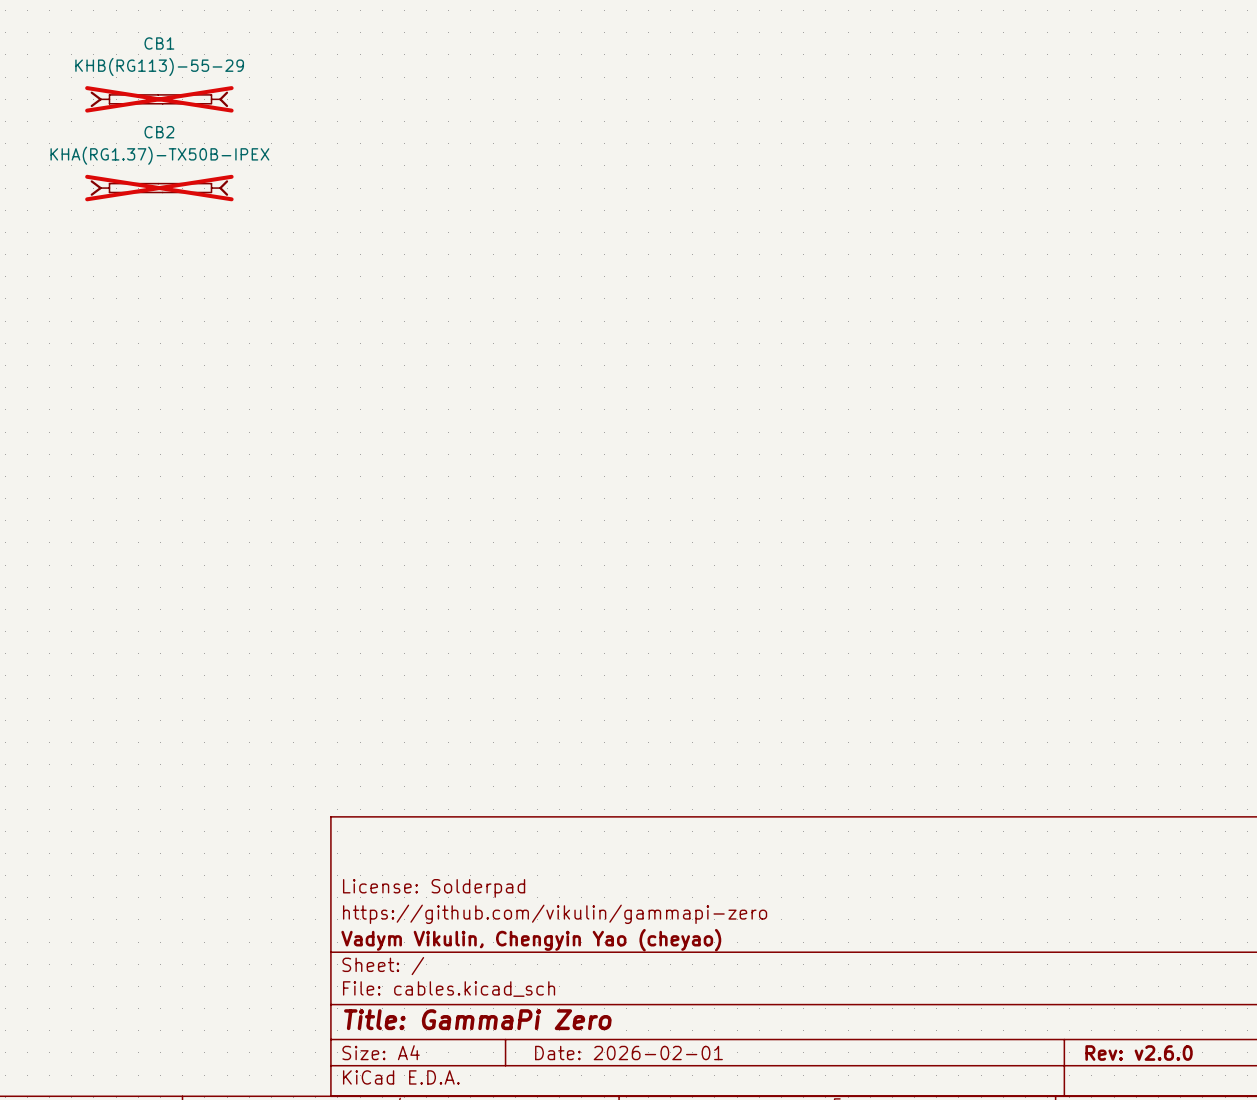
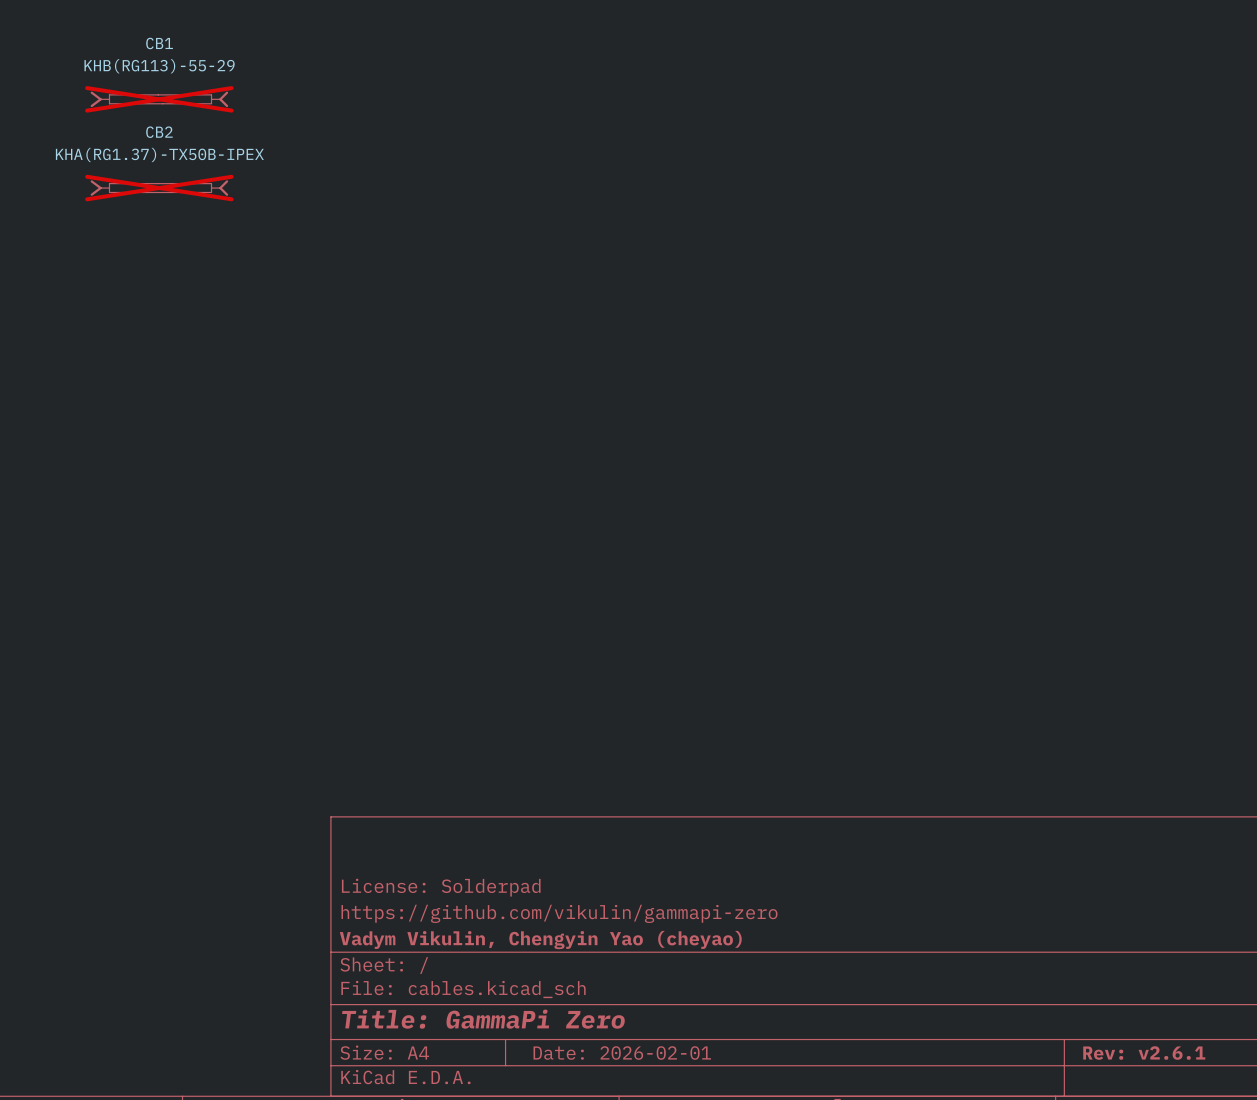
title block: Rev: v2.6.0 (1139, 1053) -> Rev: v2.6.1 (1144, 1053)

